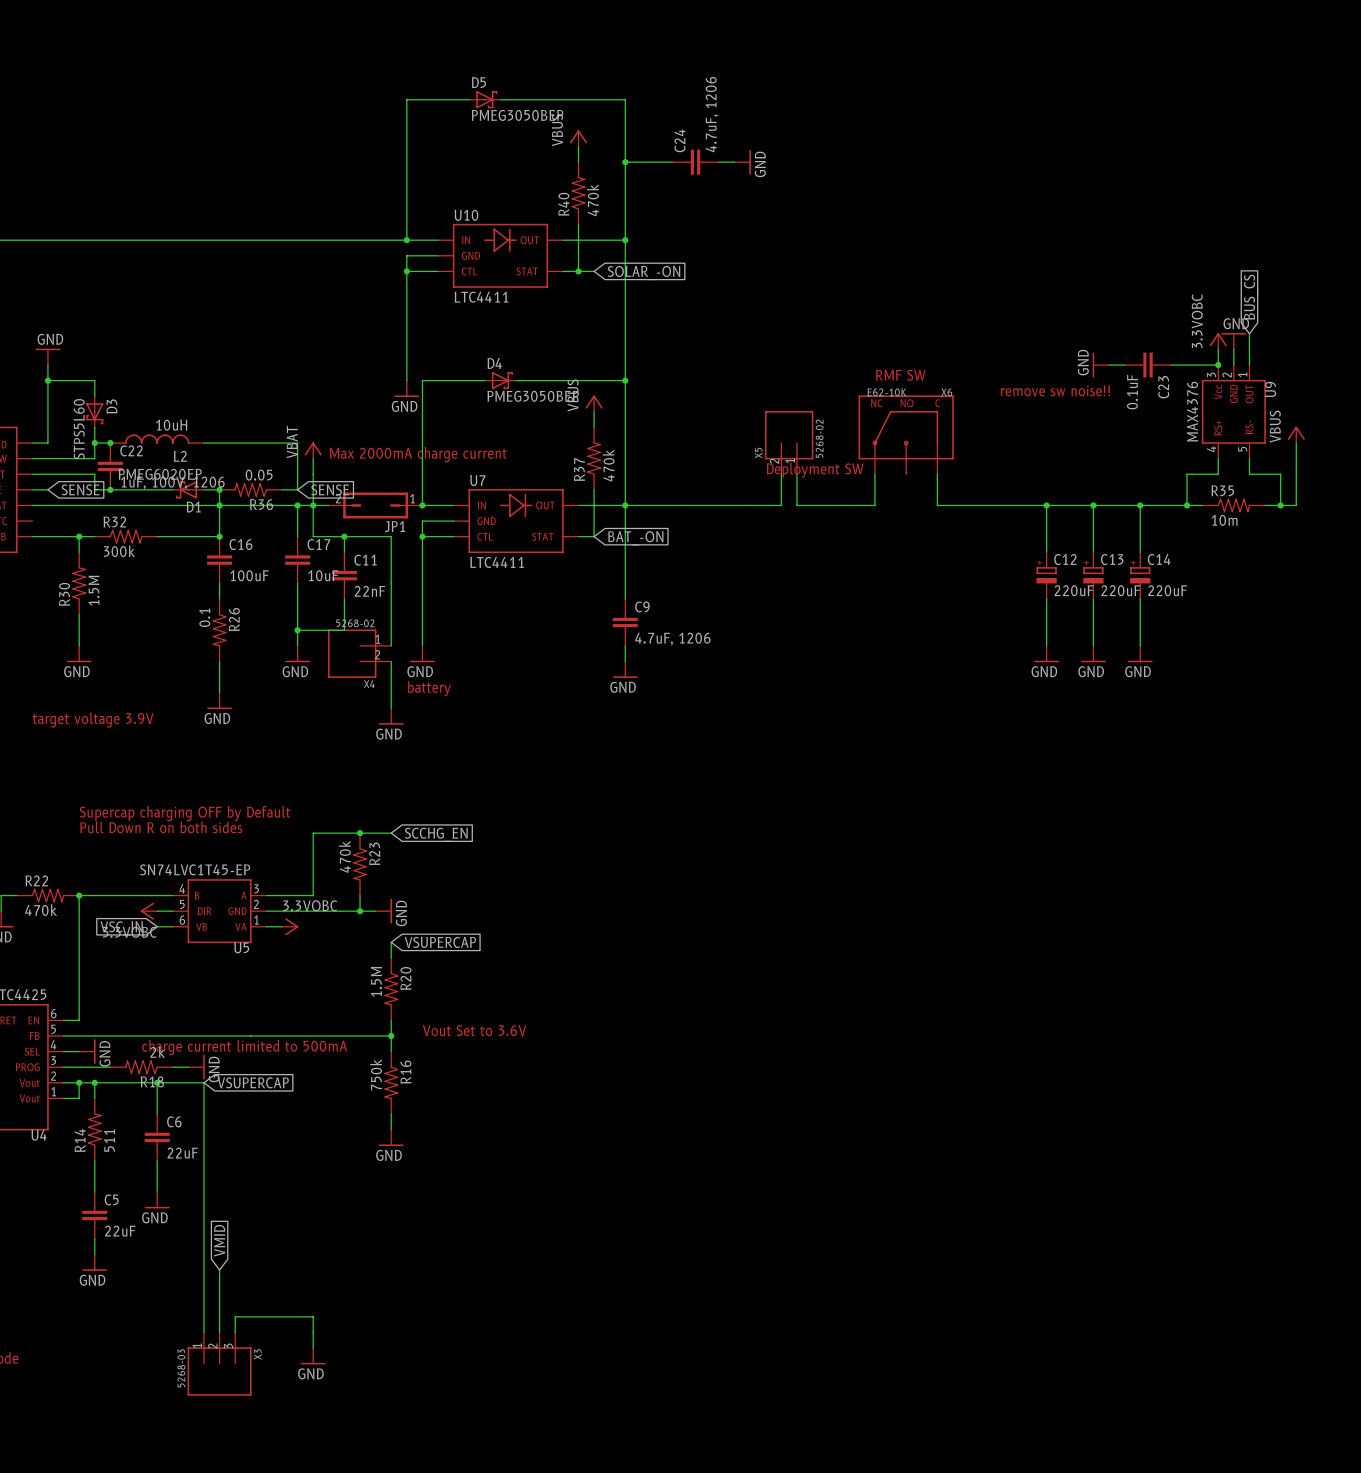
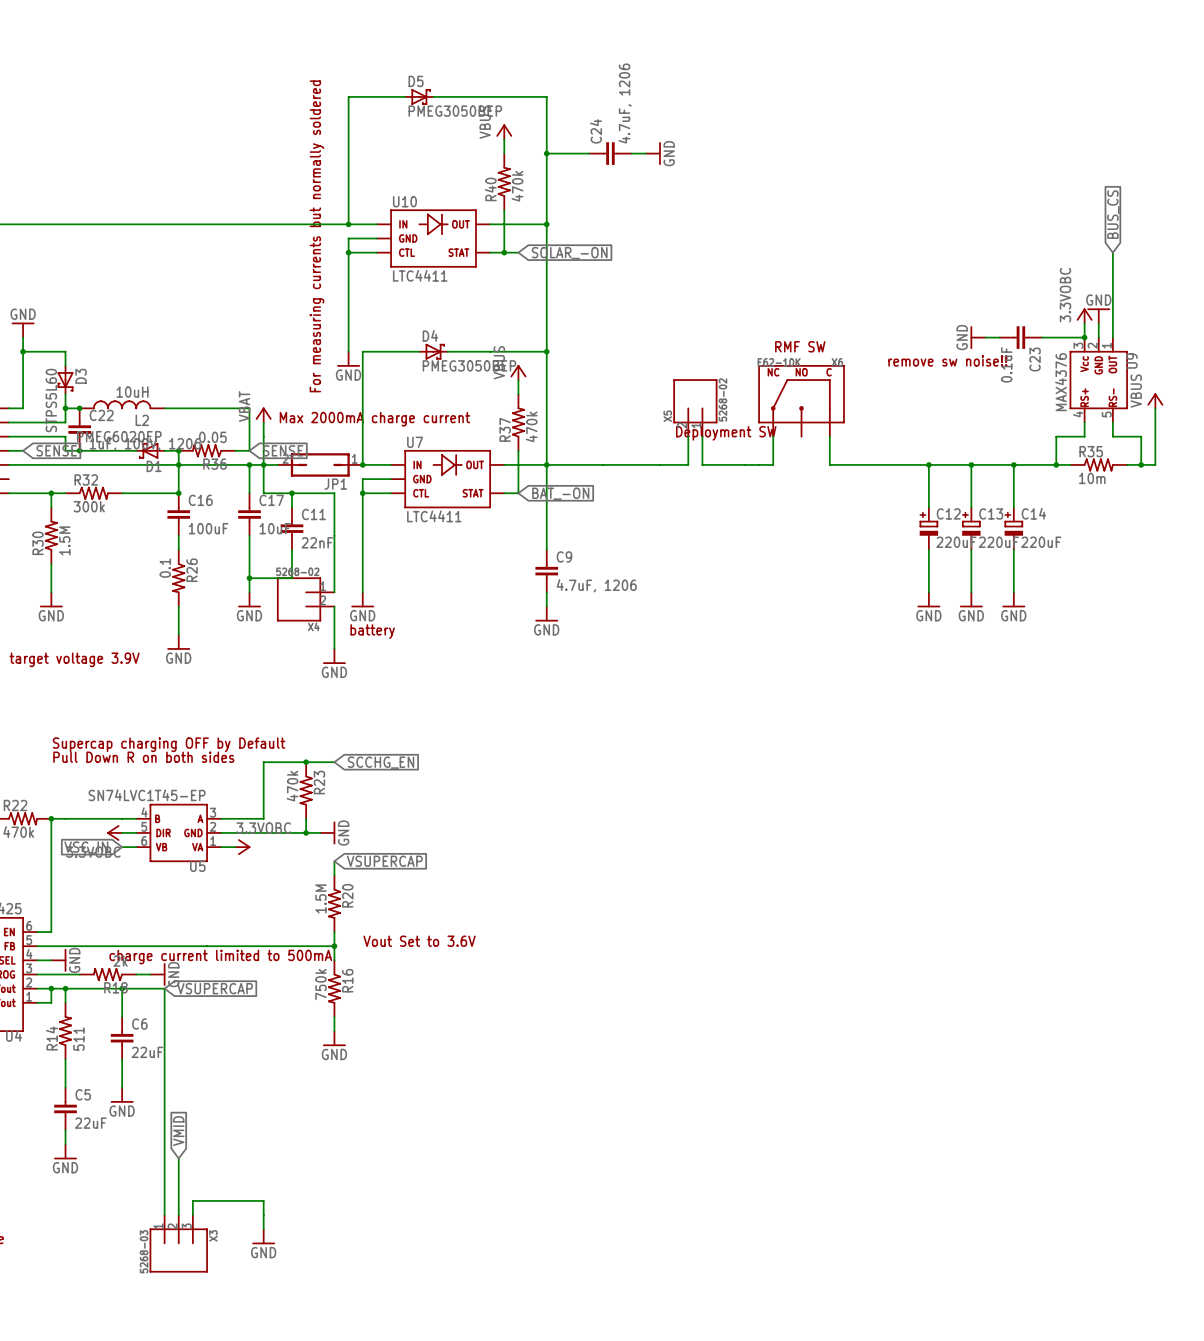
wire: none -> (1112, 252) (1112, 309)
text: none -> For measuring currents but normally soldered (316, 236)
global label position: BUS_CS (1251, 297) -> BUS_CS (1113, 214)

